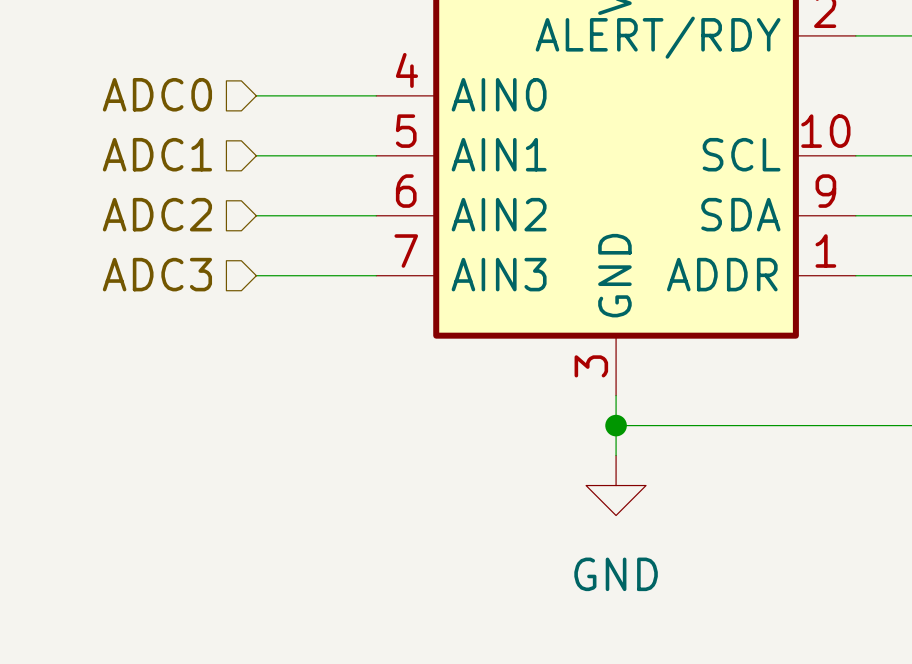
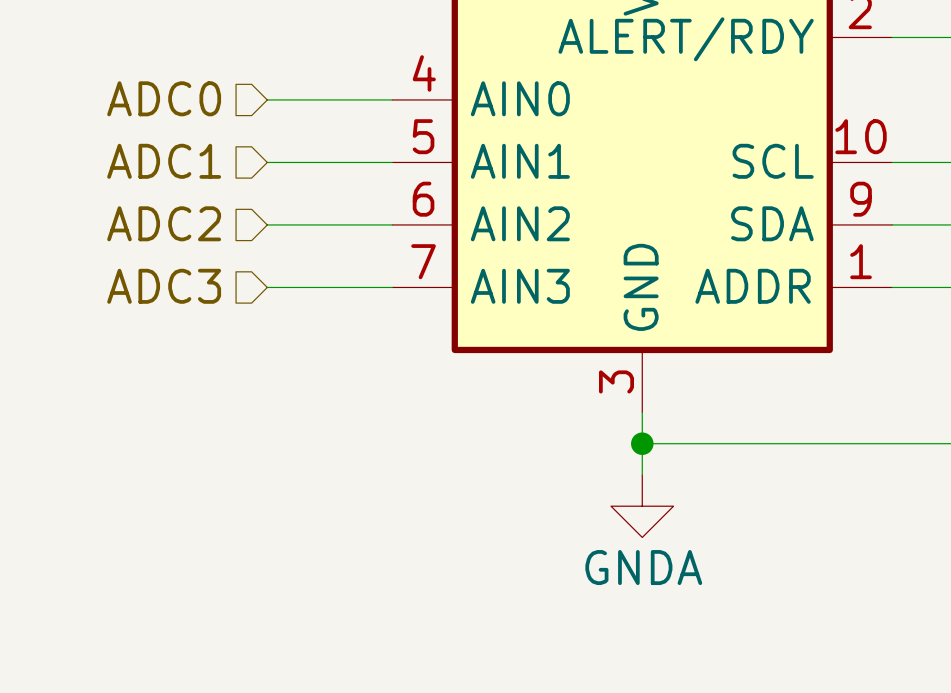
power symbol: GND (616, 485) -> GNDA (642, 506)

